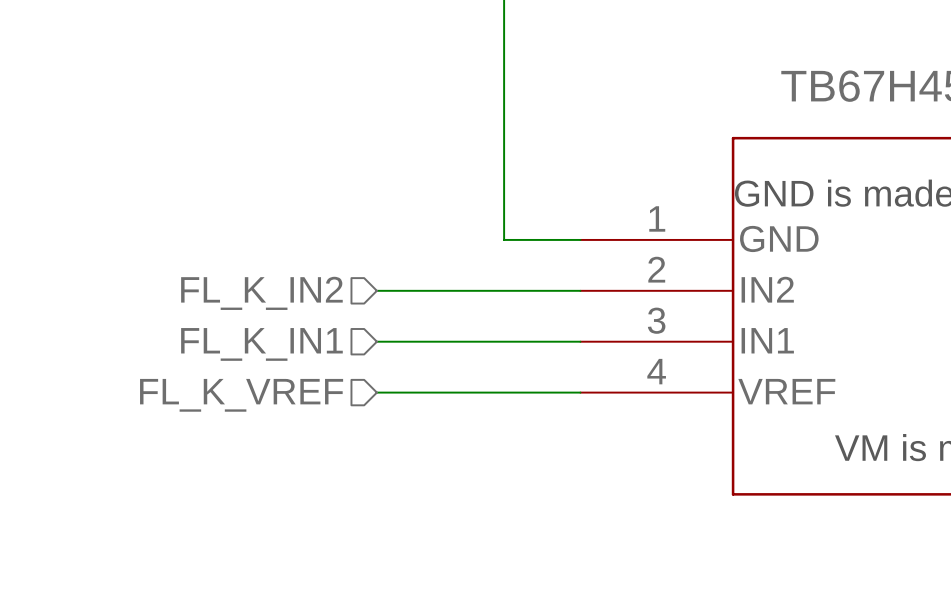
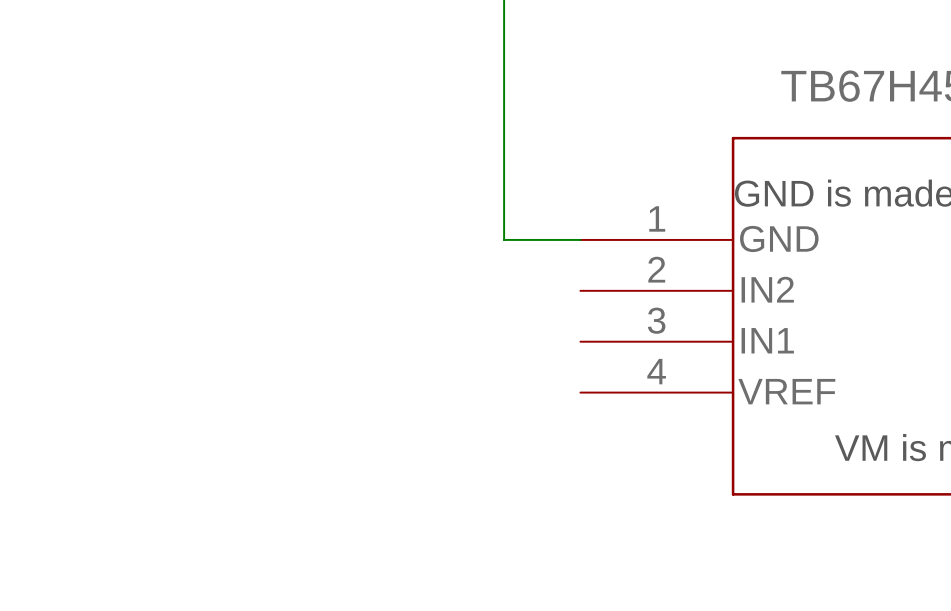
wire: (376, 290) (580, 290) -> none
hierarchical label: FL_K_IN2 (261, 293) -> none
wire: (376, 341) (580, 341) -> none
hierarchical label: FL_K_IN1 (261, 344) -> none
wire: (376, 392) (580, 392) -> none
hierarchical label: FL_K_VREF (241, 395) -> none

